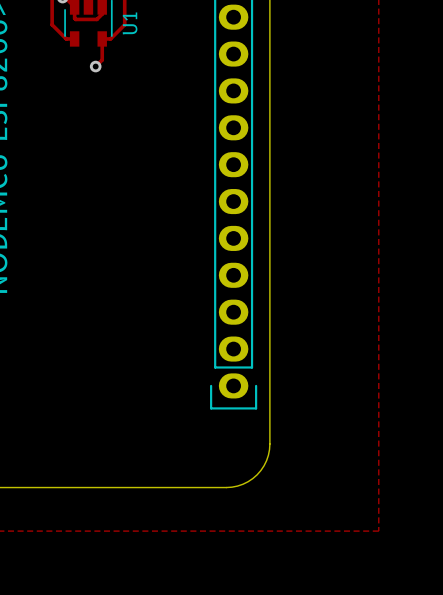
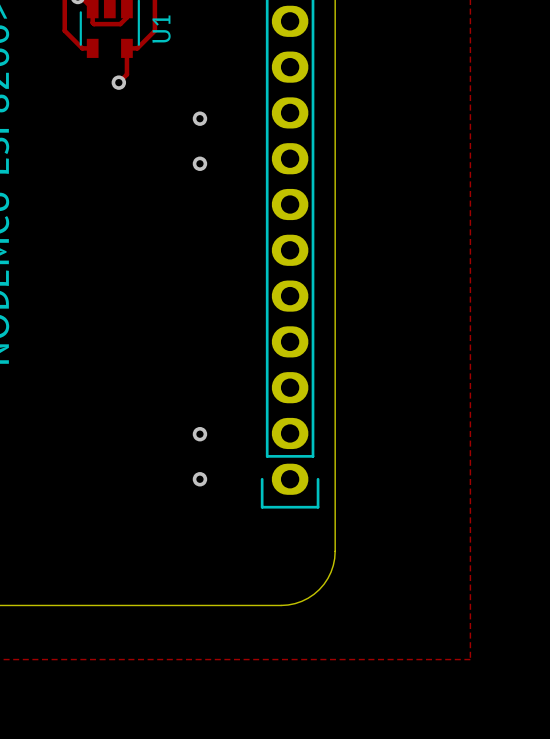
via: none -> (199, 118)
via: none -> (199, 163)
via: none -> (199, 434)
via: none -> (199, 479)

